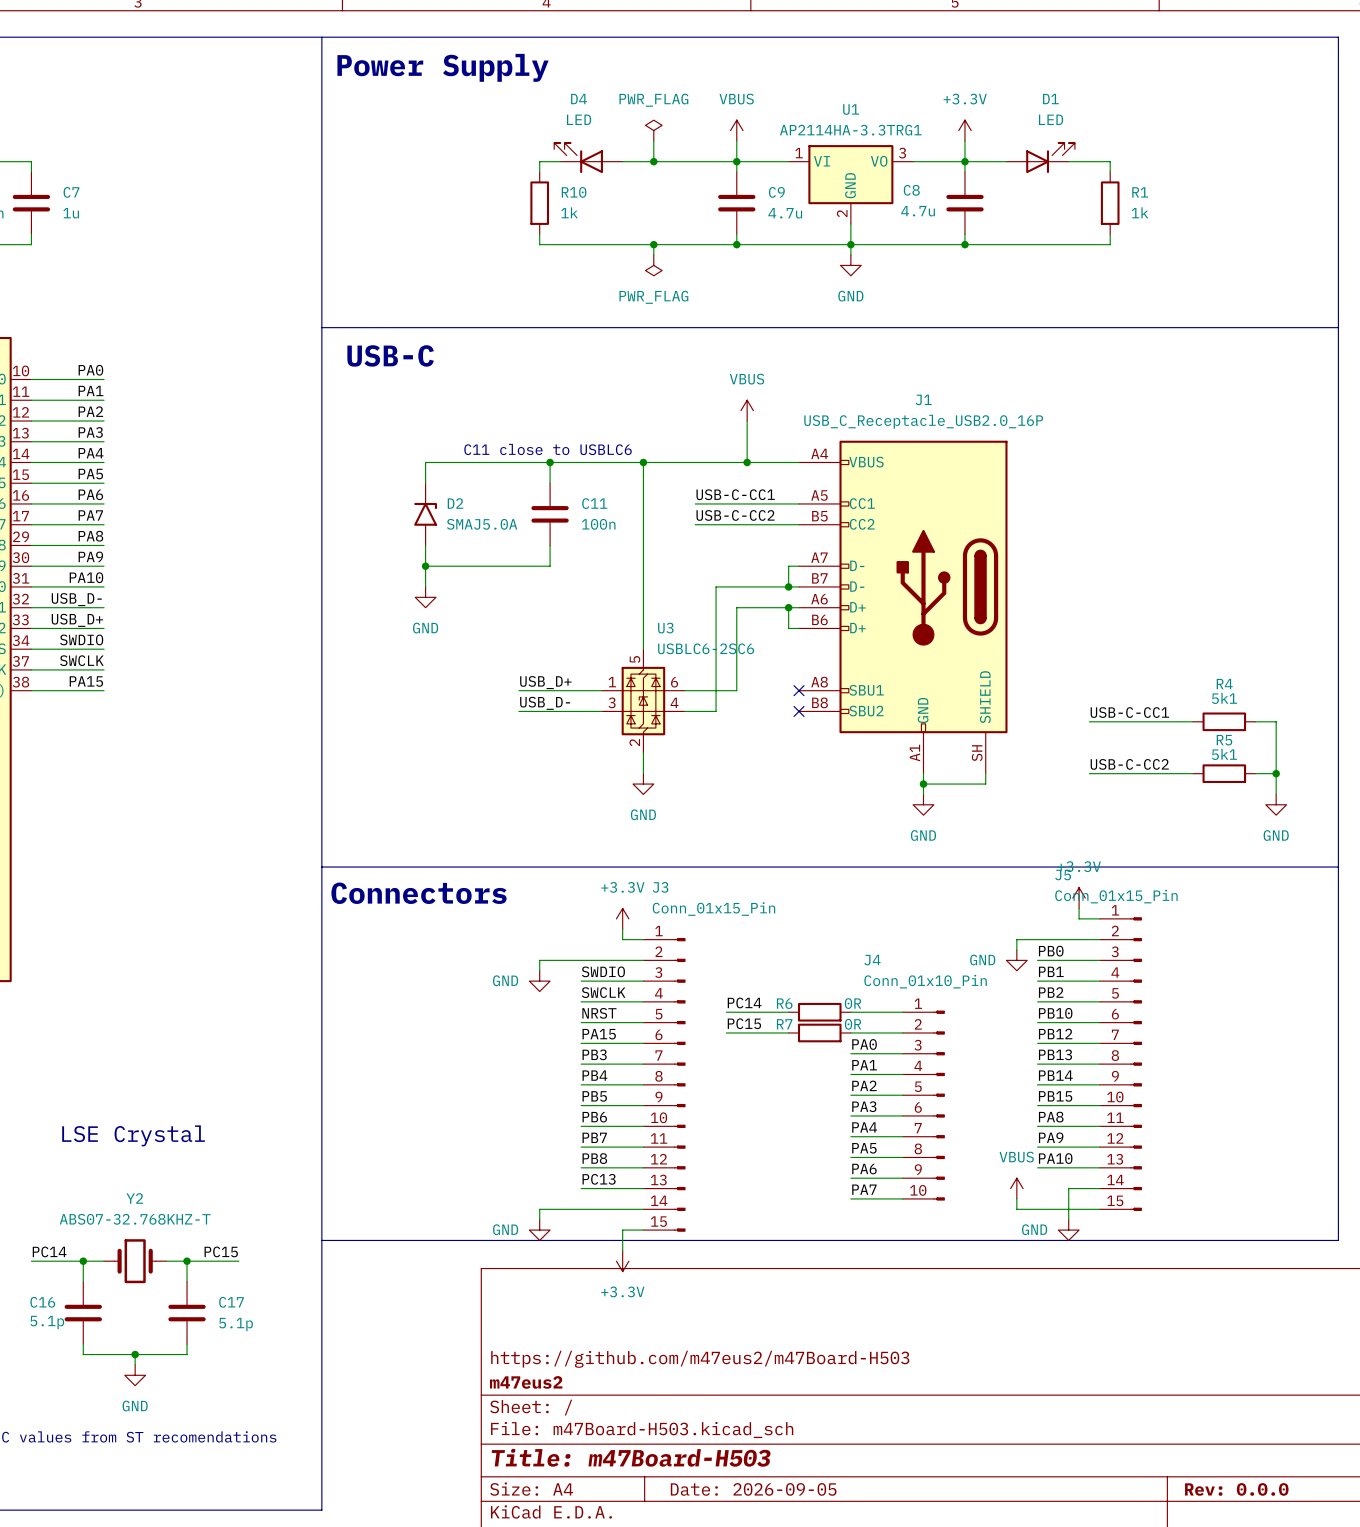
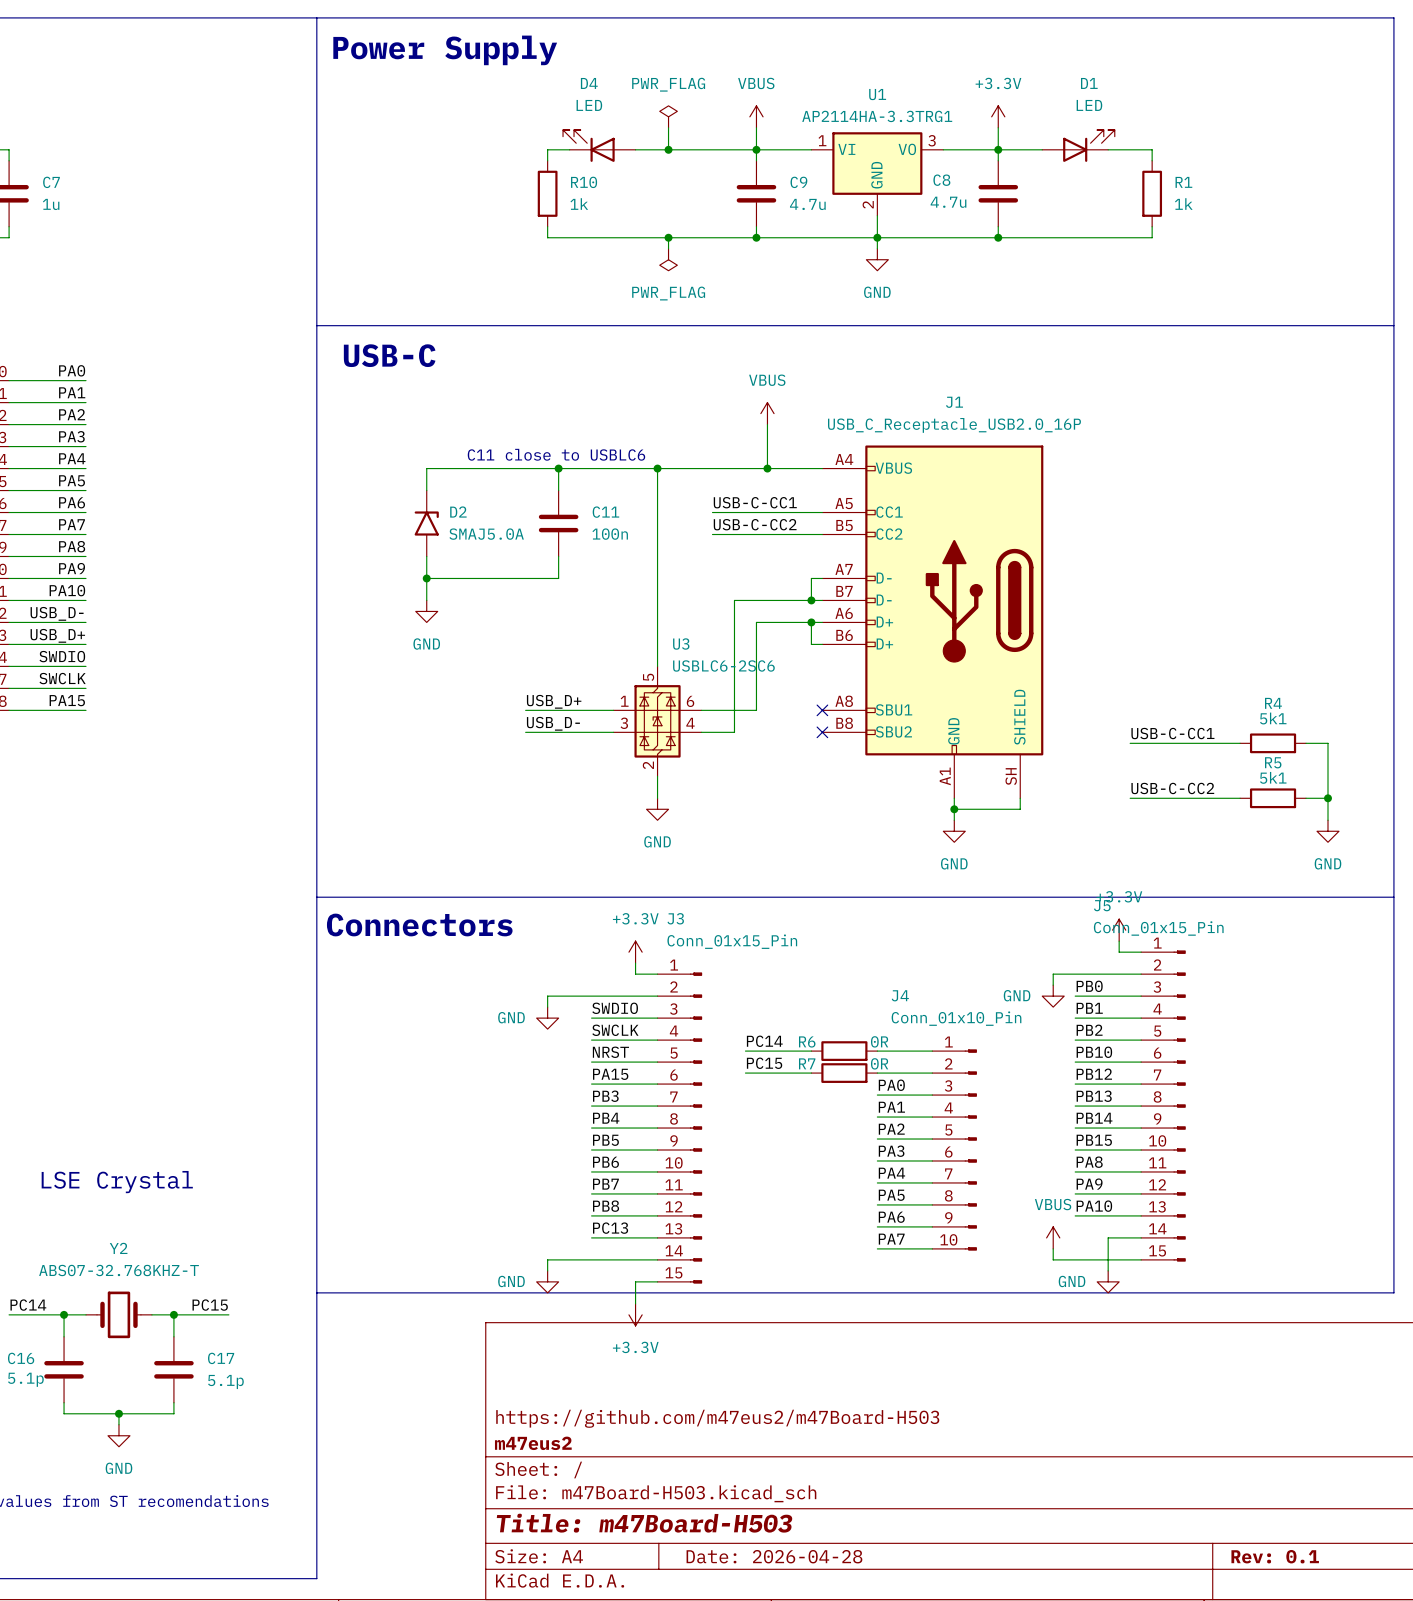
title block: Date: 2026-09-05 (753, 1489) -> Date: 2026-04-28 (774, 1556)
title block: Rev: 0.0.0 (1236, 1489) -> Rev: 0.1 (1275, 1556)

